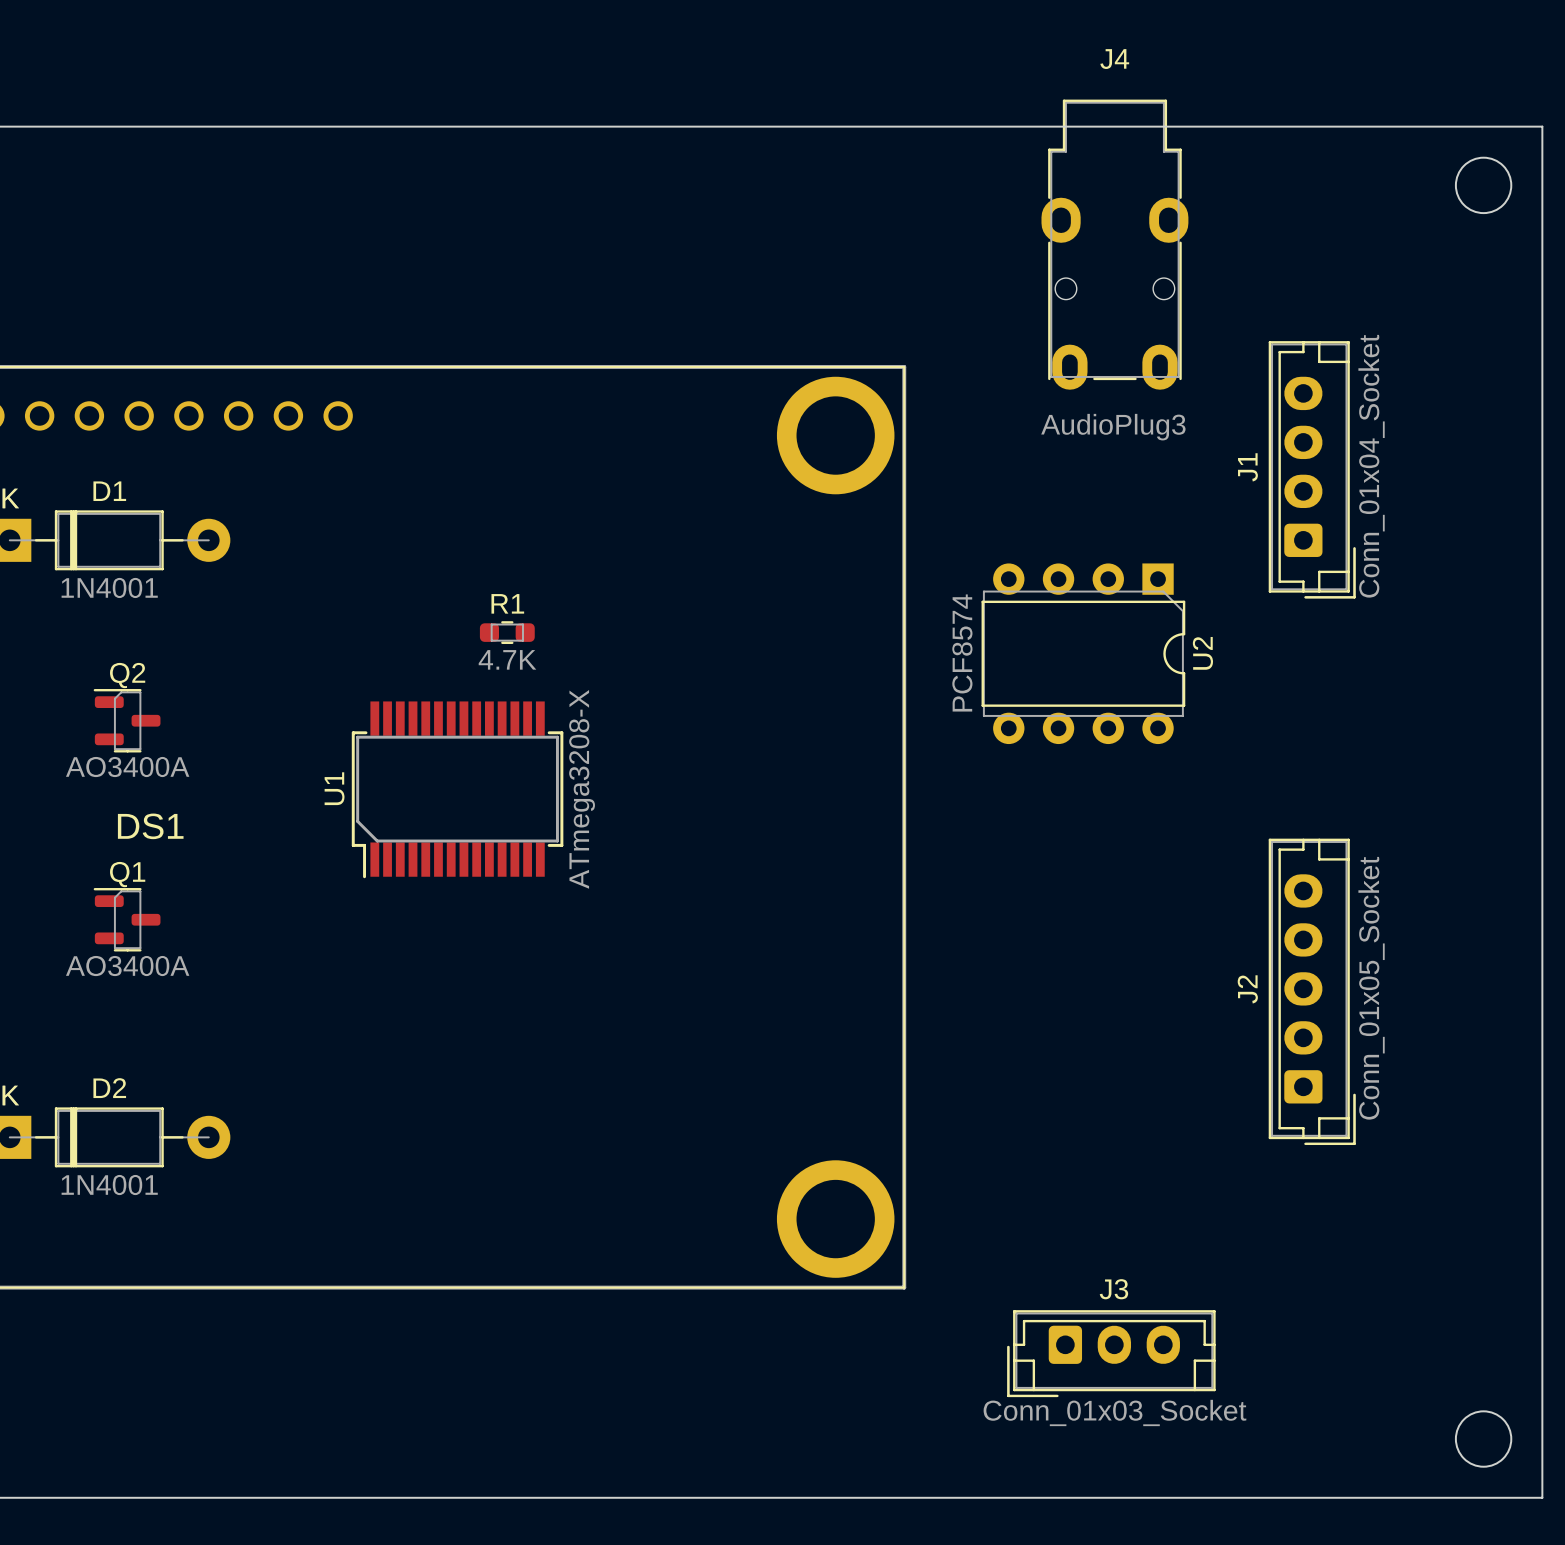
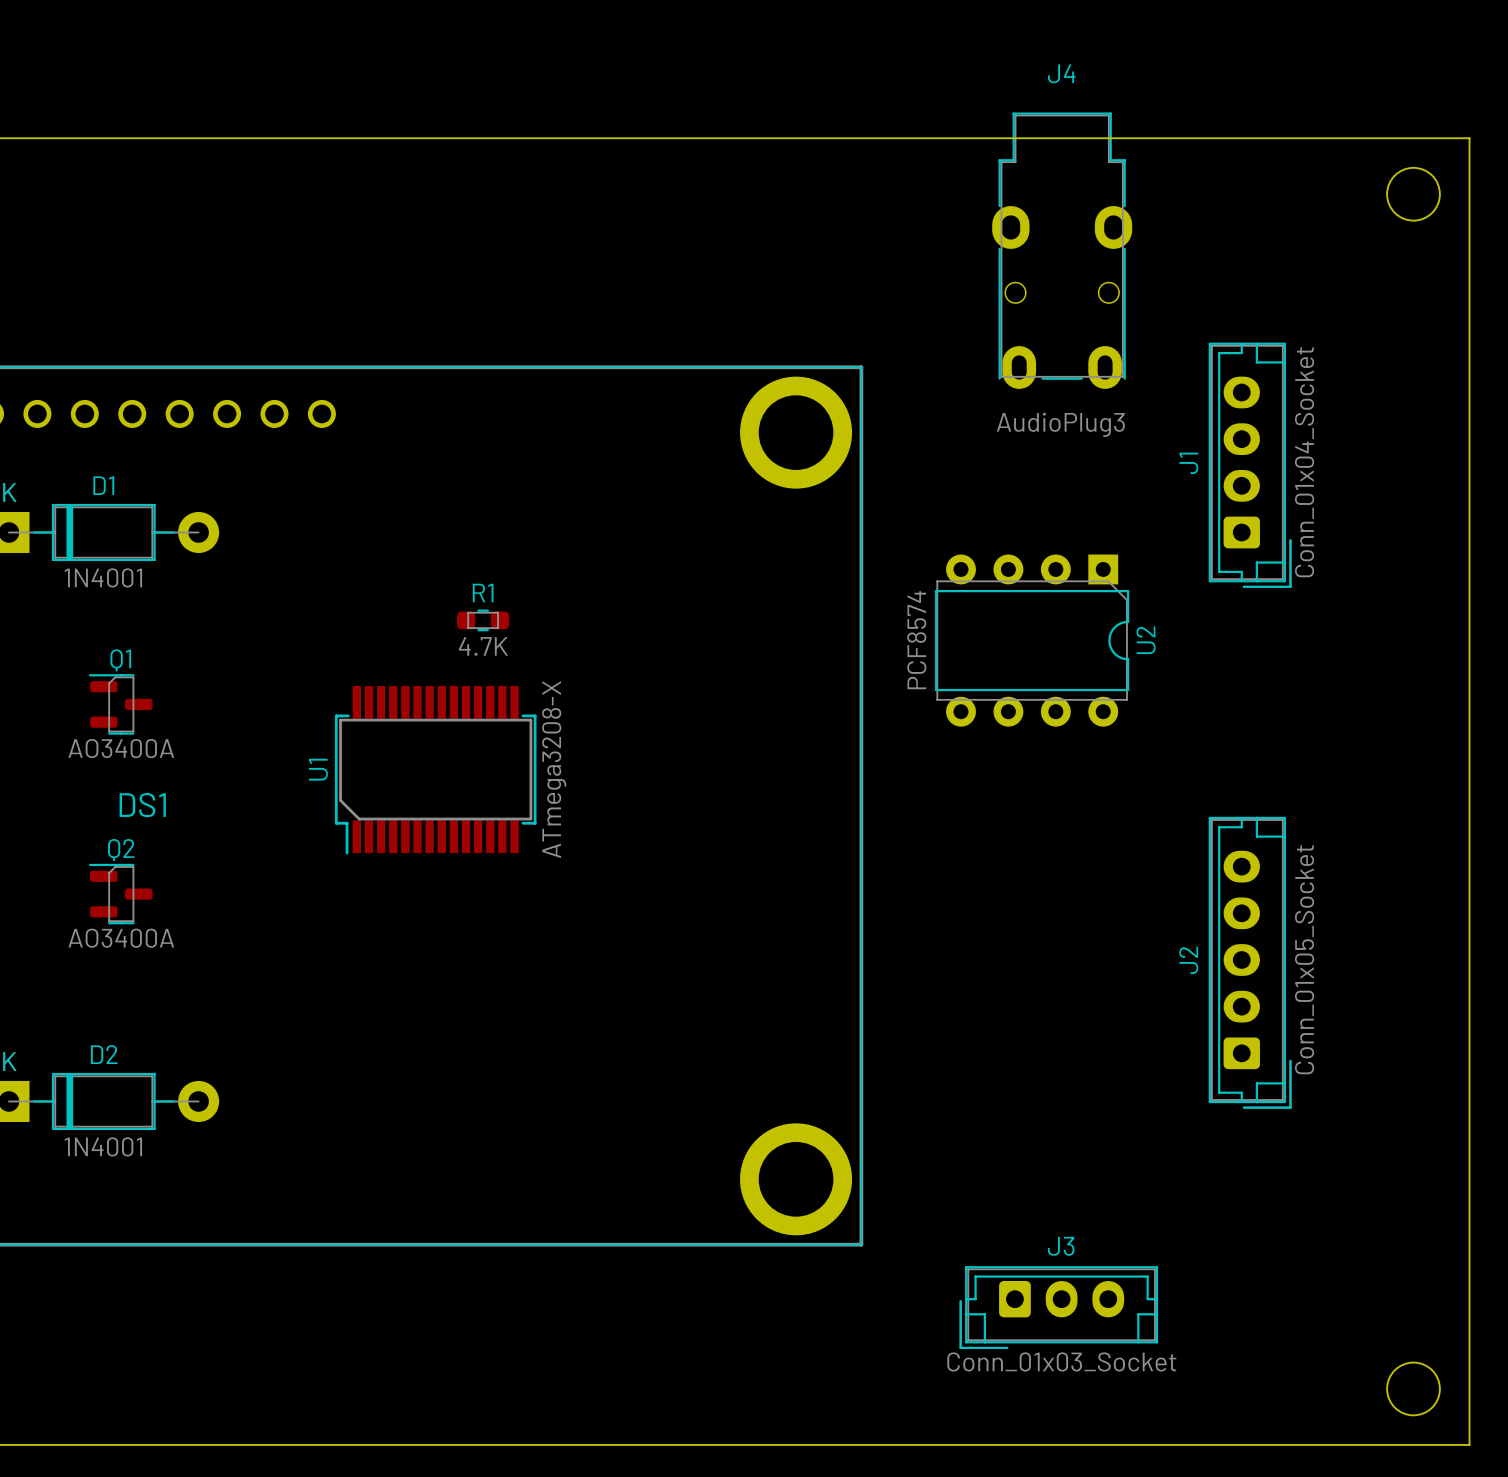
Q2 name: Q2 (127, 675) -> Q1 (120, 660)
Q1 name: Q1 (127, 874) -> Q2 (121, 850)

